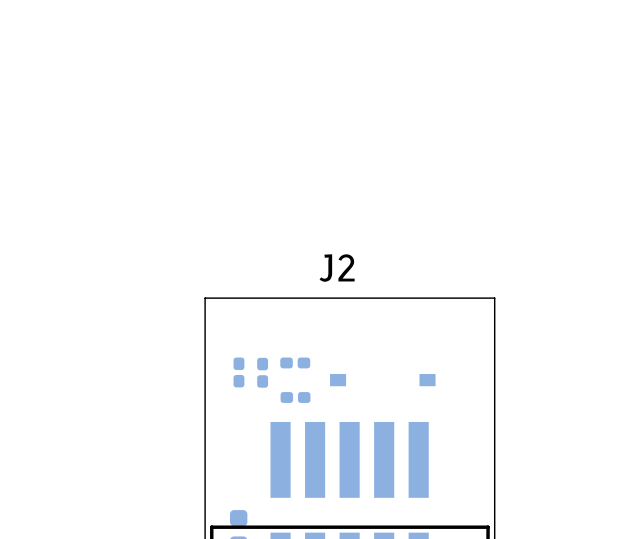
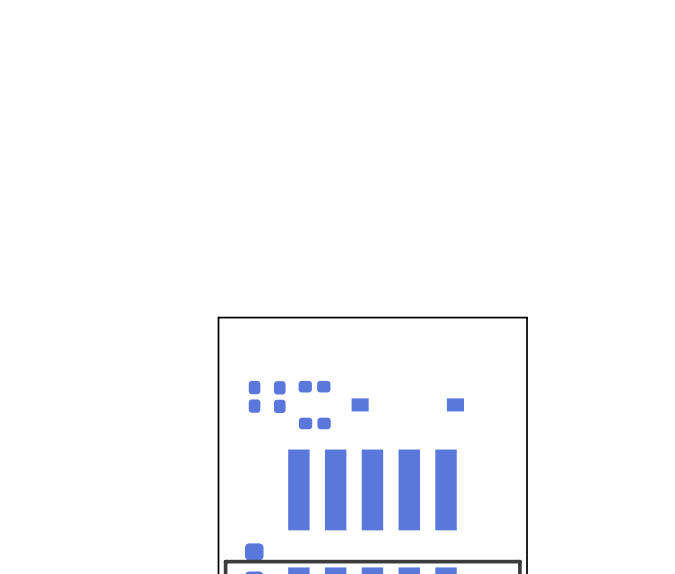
J2 name: J2 (337, 268) -> none

